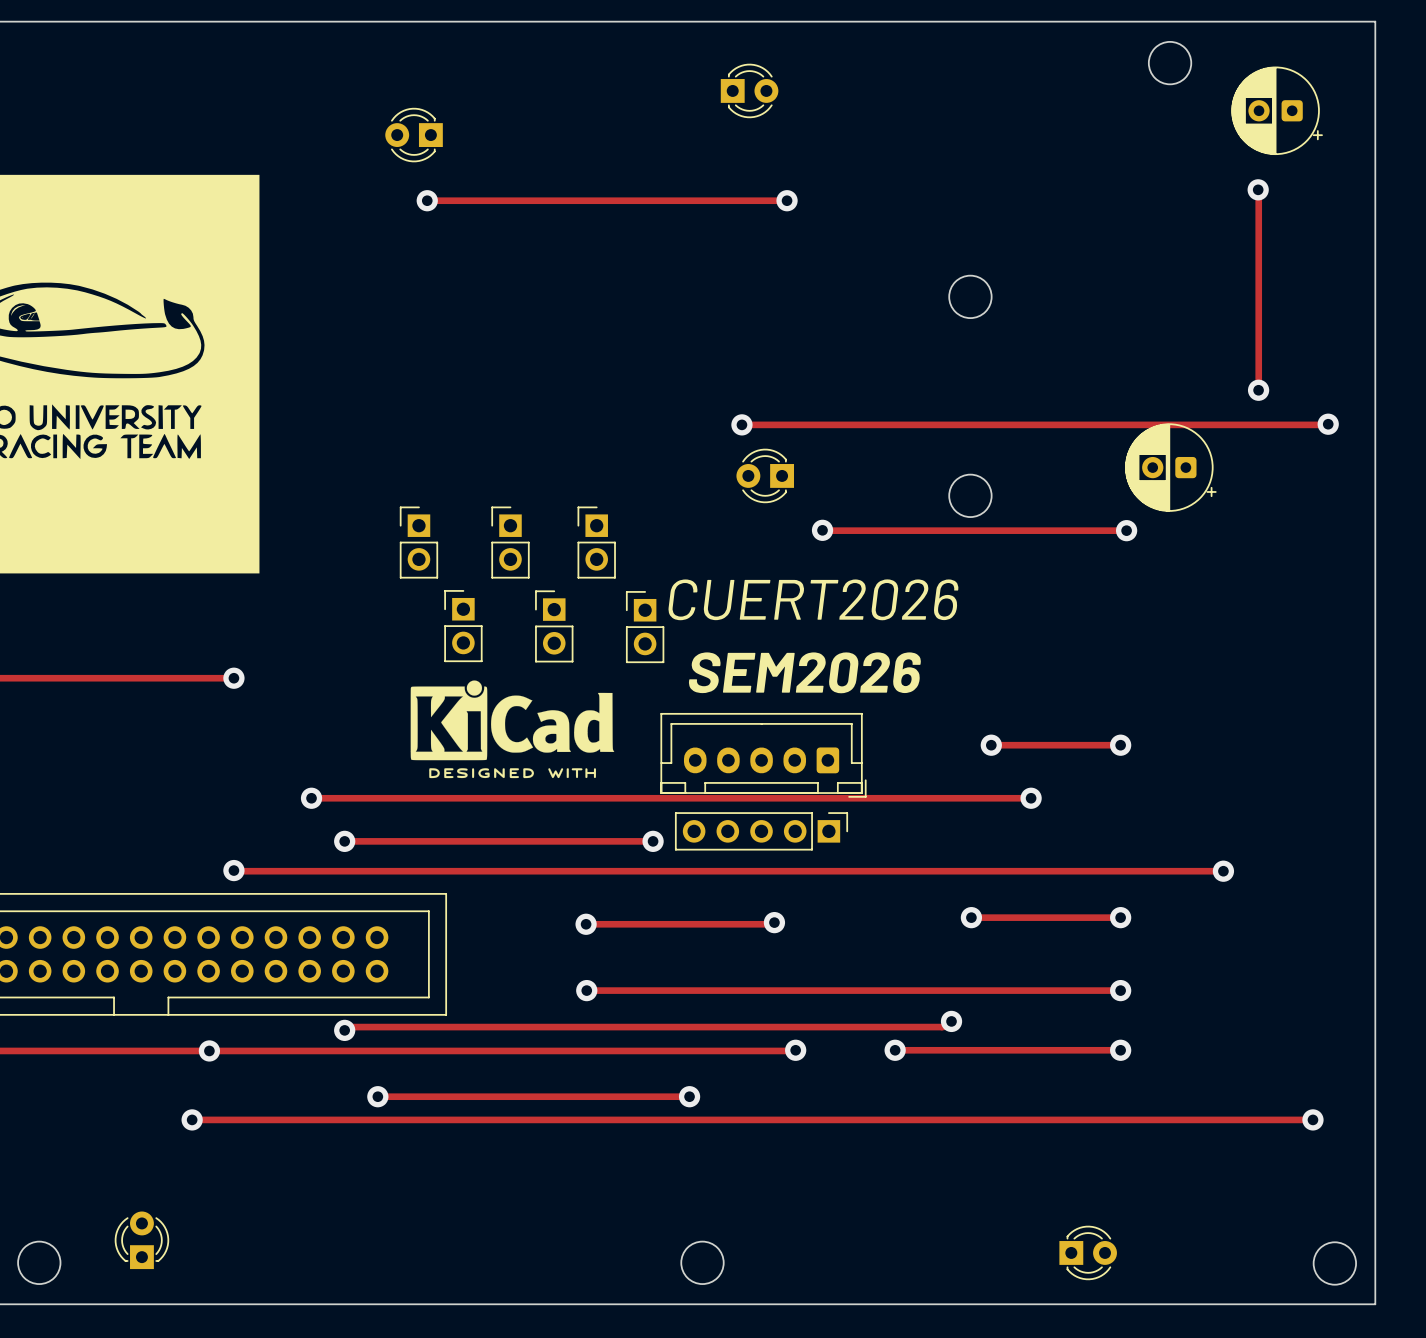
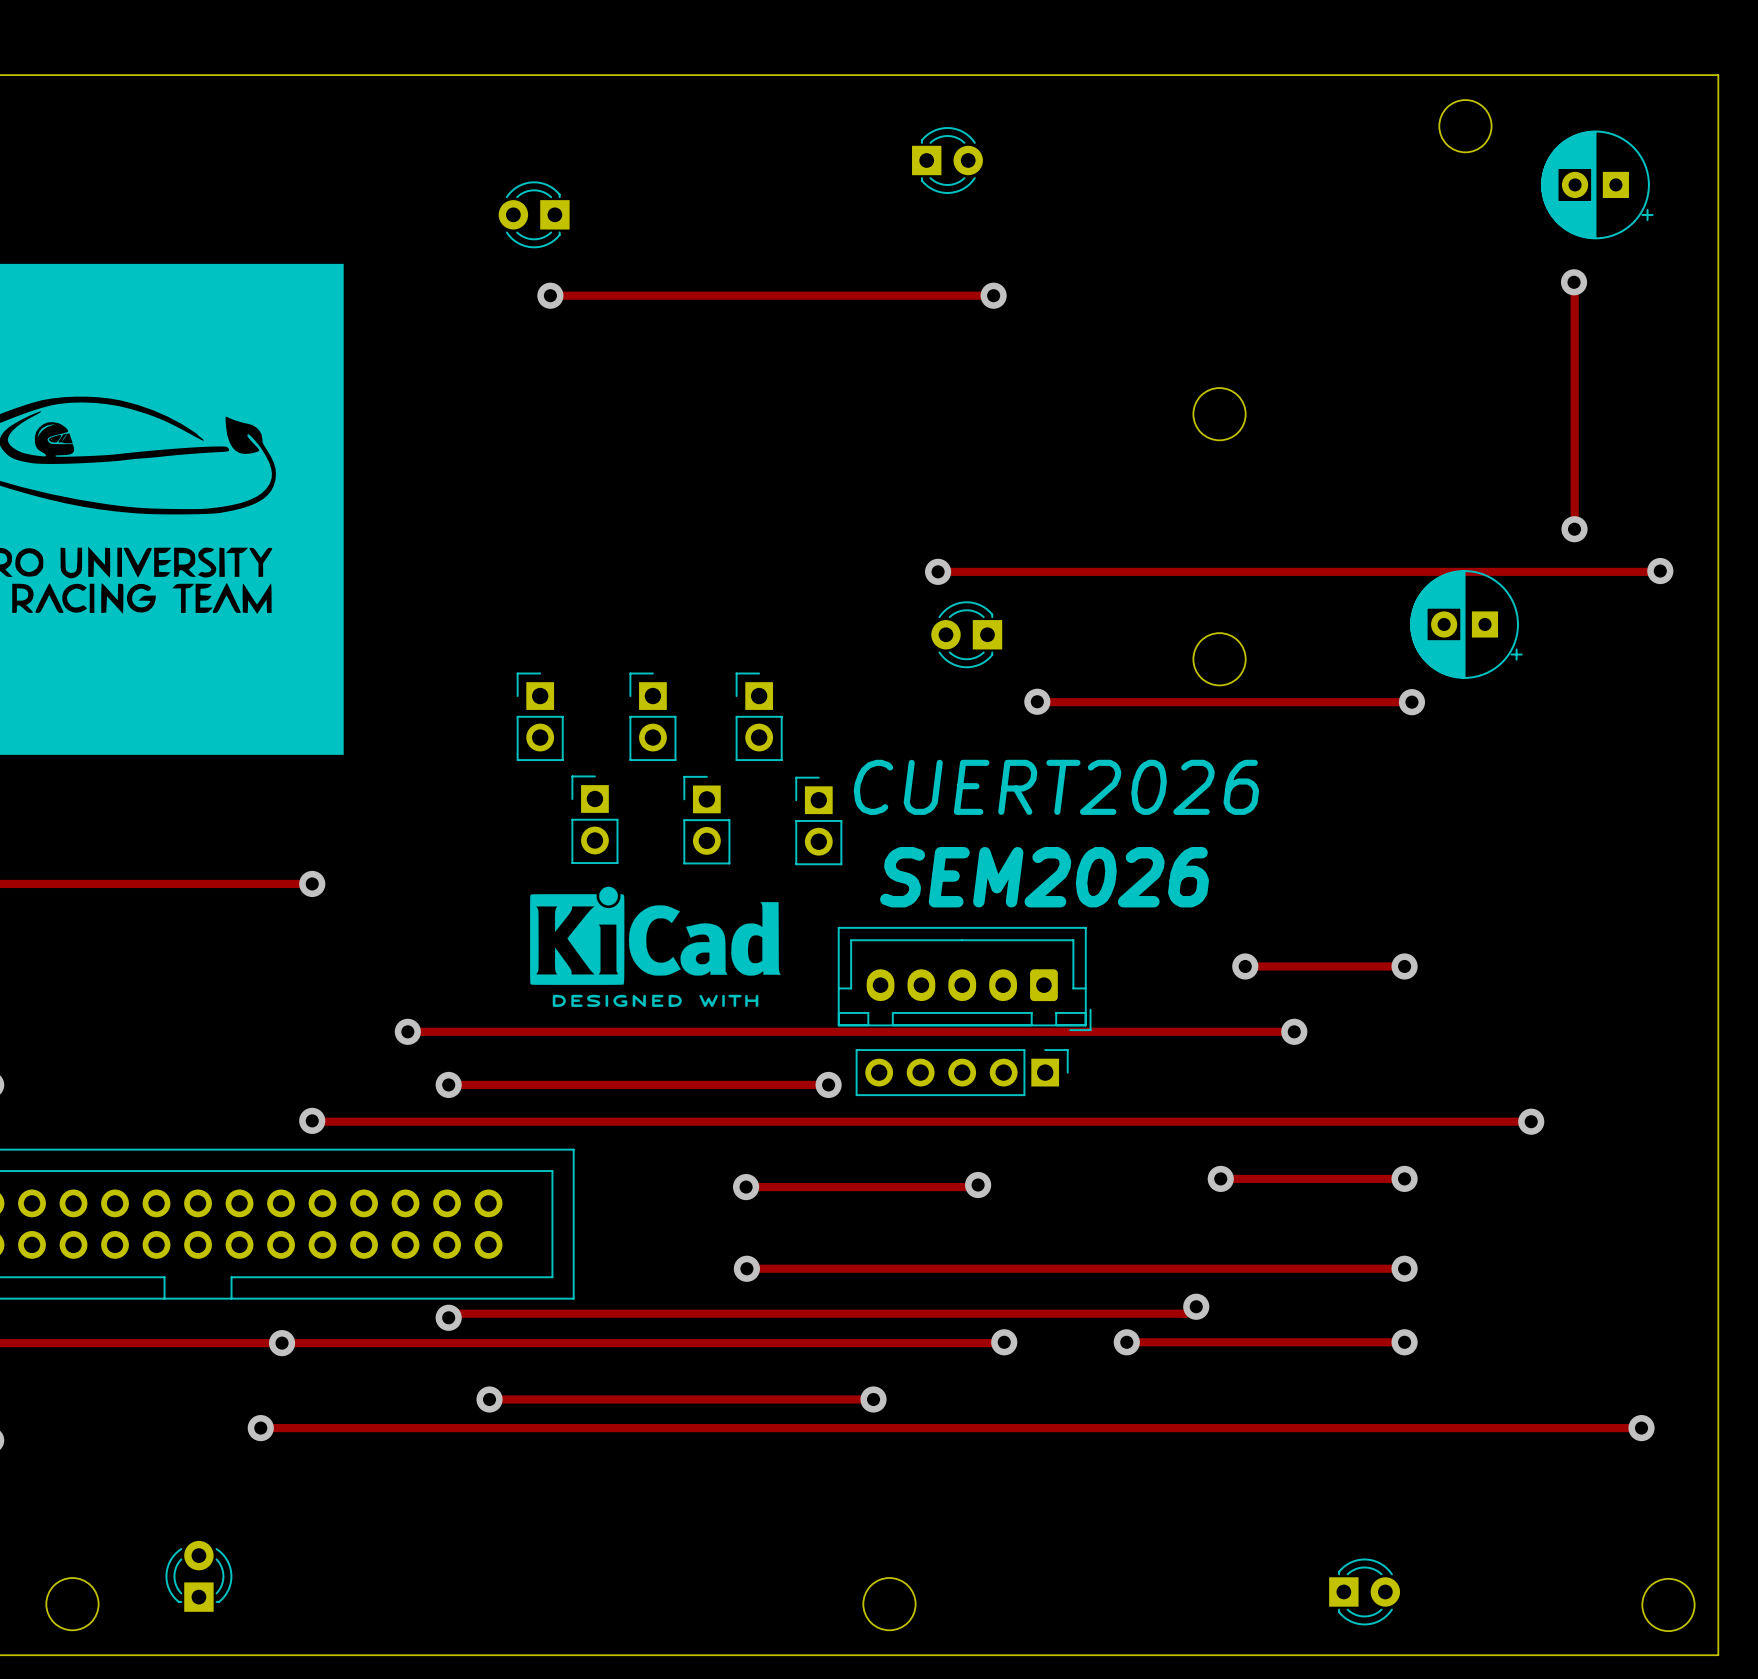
part footprint: [1231, 66, 1323, 155] -> [1541, 130, 1654, 240]
part footprint: [1125, 423, 1217, 512] -> [1410, 570, 1523, 679]

